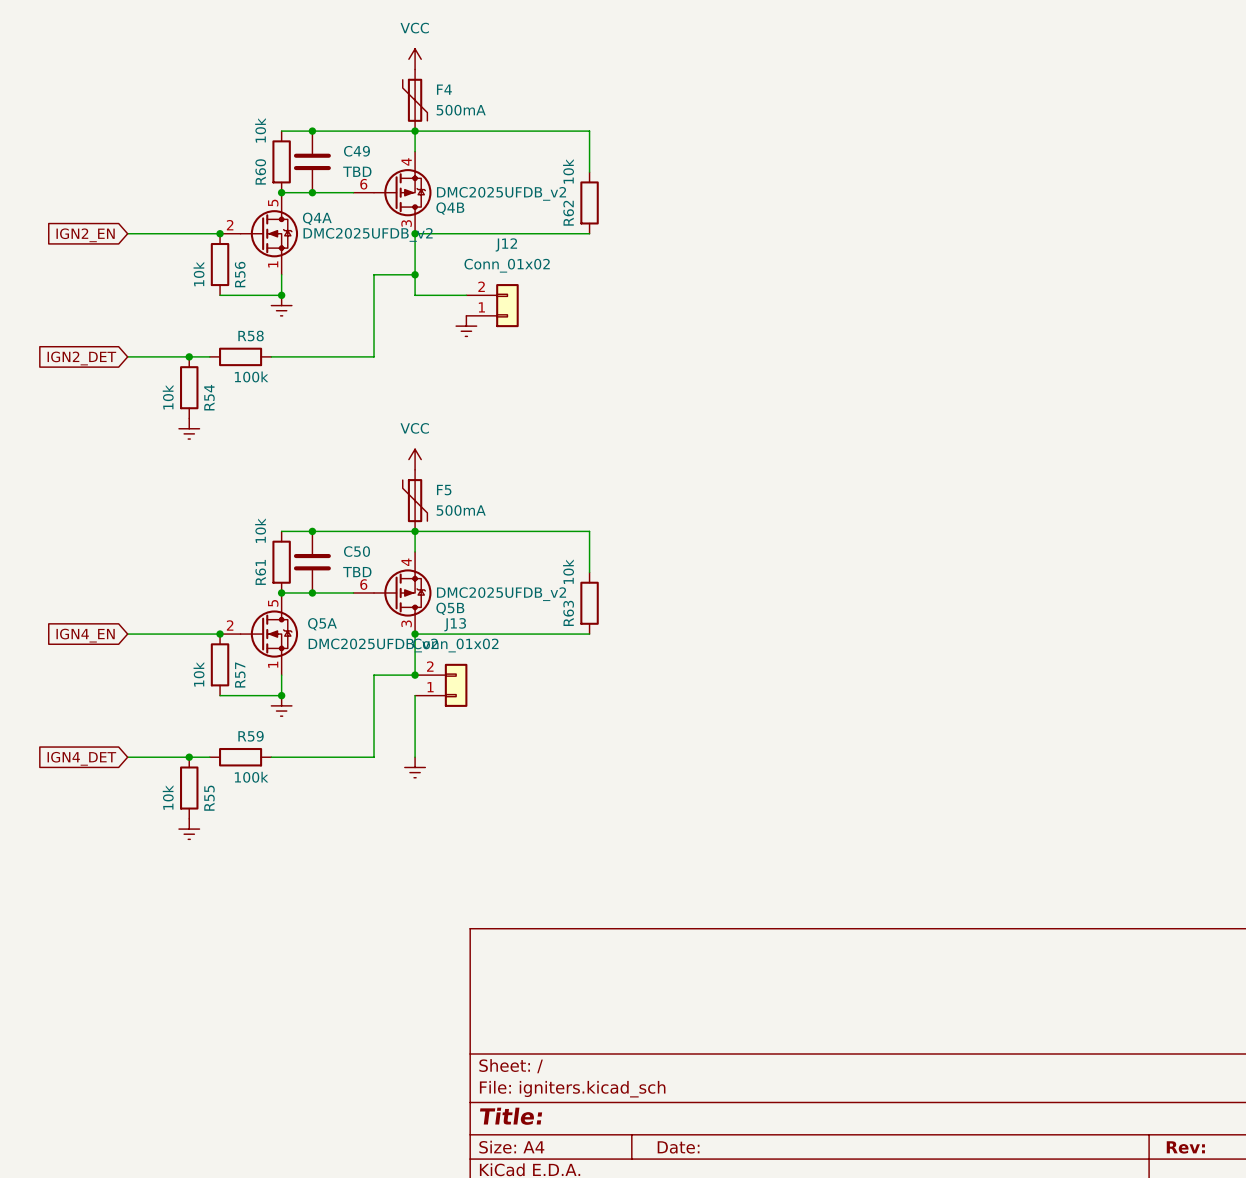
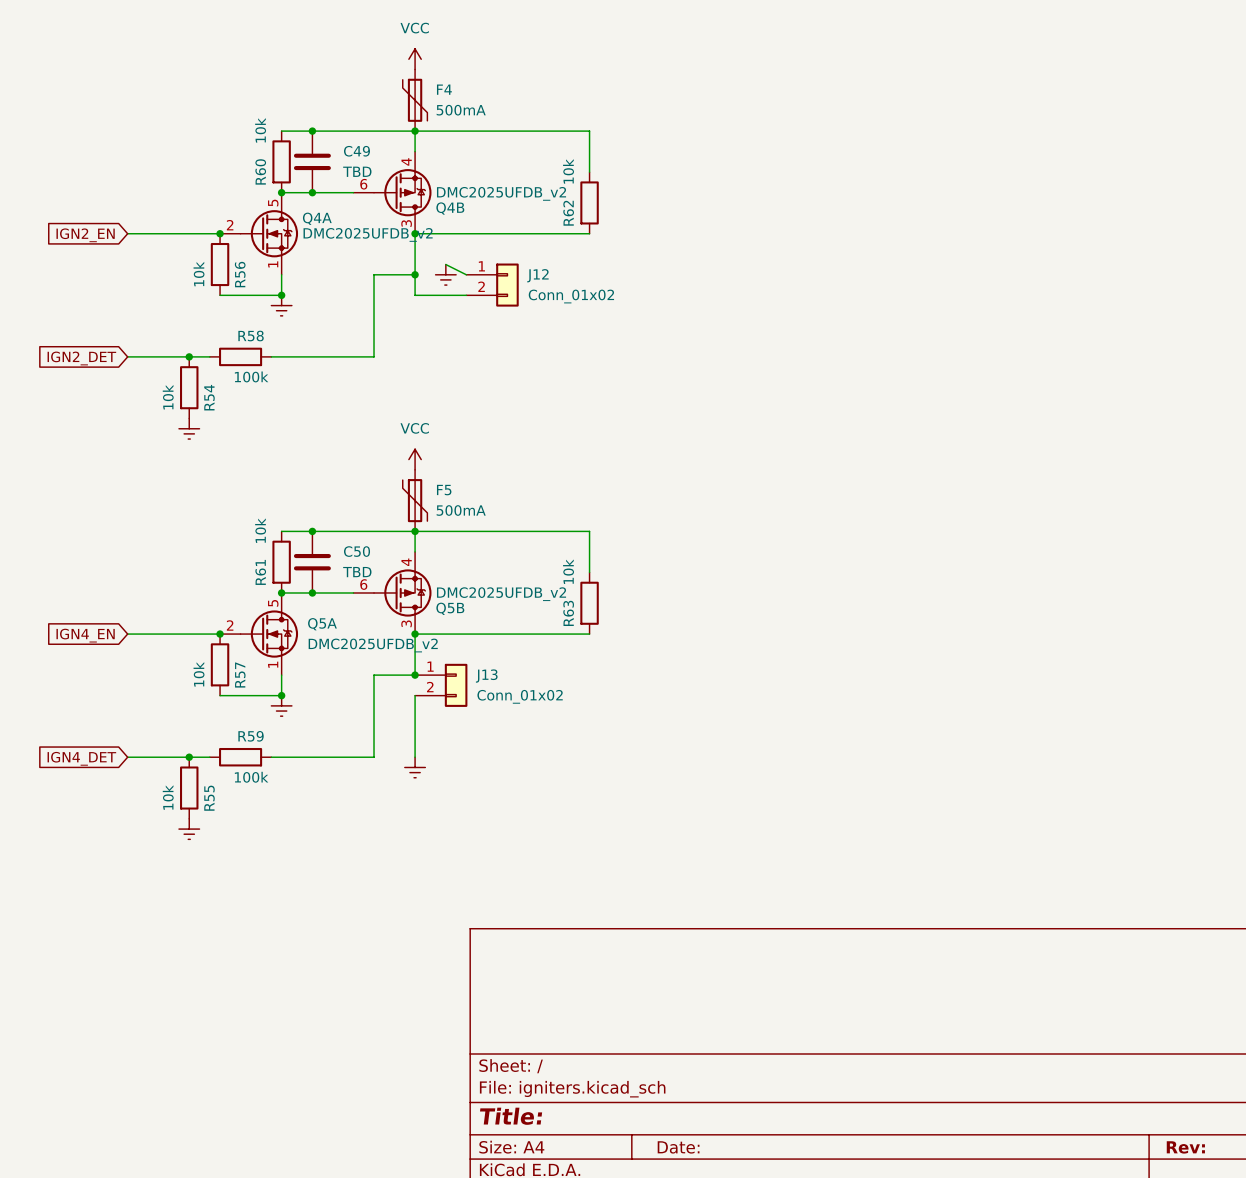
J12 name position: J12 (506, 244) -> J12 (537, 275)
wire: none -> (445, 264) (466, 274)
J12 value position: Conn_01x02 (507, 265) -> Conn_01x02 (571, 296)
J12 flip: as is (507, 305) -> up-down (507, 285)
power symbol position: (466, 326) -> (445, 274)
J13 name position: J13 (455, 624) -> J13 (486, 676)
J13 value position: Conn_01x02 (455, 645) -> Conn_01x02 (520, 696)
J13 flip: as is (456, 685) -> up-down (456, 685)

